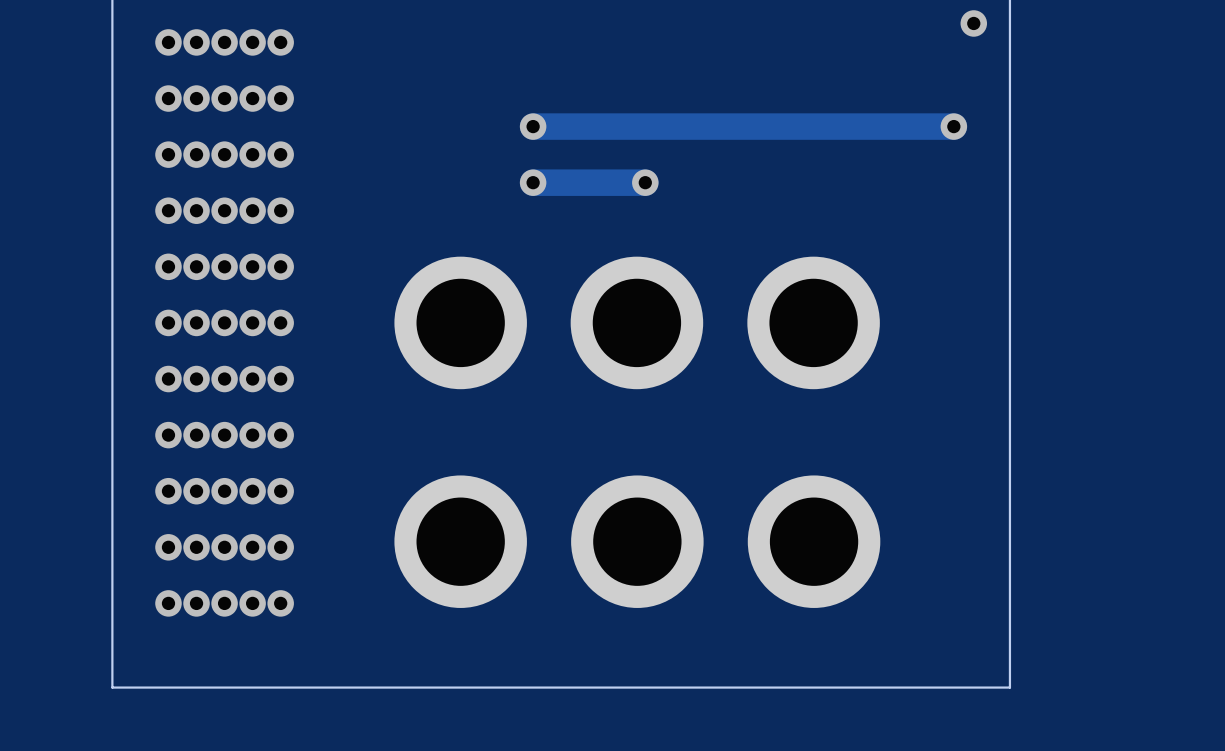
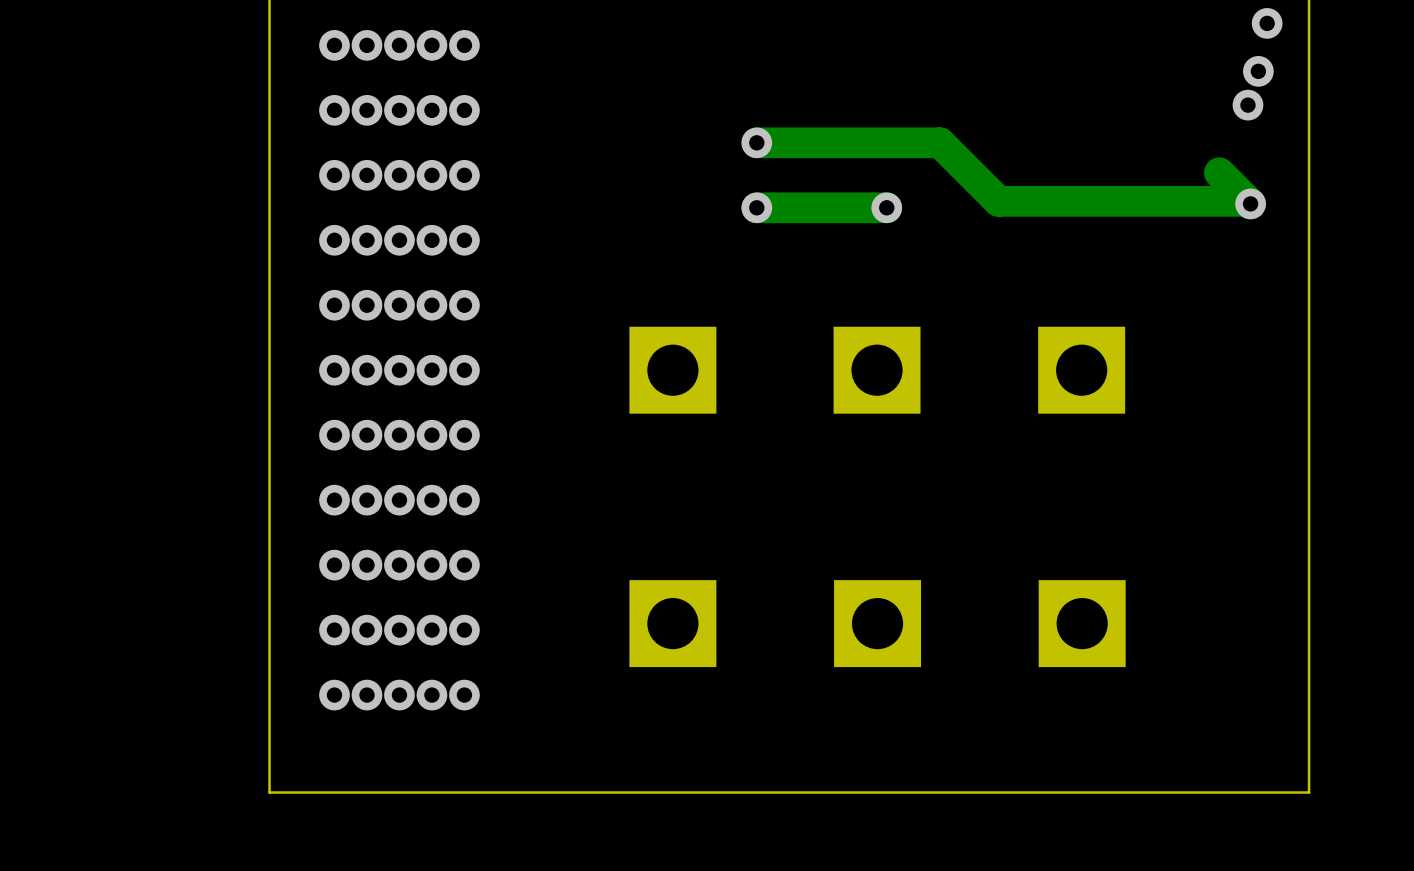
via: none -> (1258, 71)
via: none -> (1247, 105)
track: (953, 126) (691, 126) -> (1247, 201) (998, 201) (940, 142)
via: (953, 126) -> none
track: none -> (1219, 172) (1250, 203)
via: none -> (1250, 203)
part footprint: [394, 256, 527, 390] -> [629, 326, 717, 414]
part footprint: [570, 256, 704, 390] -> [833, 326, 921, 414]
part footprint: [747, 256, 880, 390] -> [1038, 326, 1126, 414]
part footprint: [394, 475, 527, 608] -> [629, 580, 717, 668]
part footprint: [571, 475, 704, 608] -> [834, 580, 922, 668]
part footprint: [747, 475, 881, 608] -> [1038, 580, 1126, 668]

